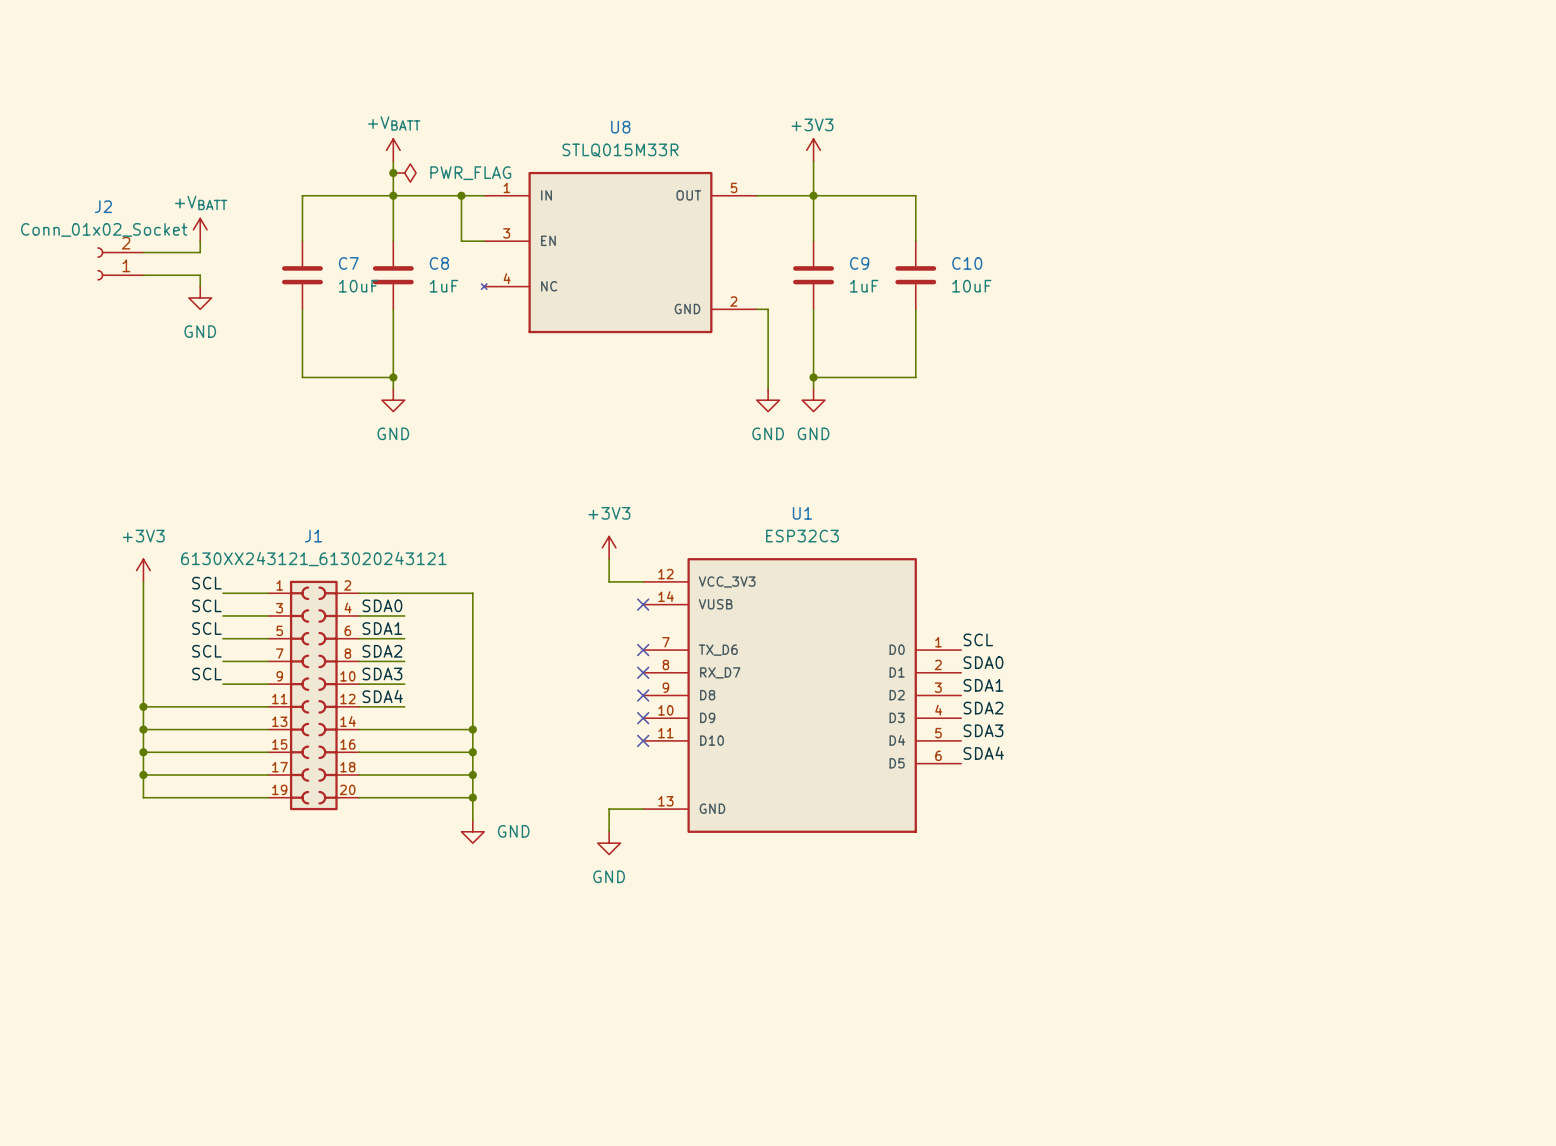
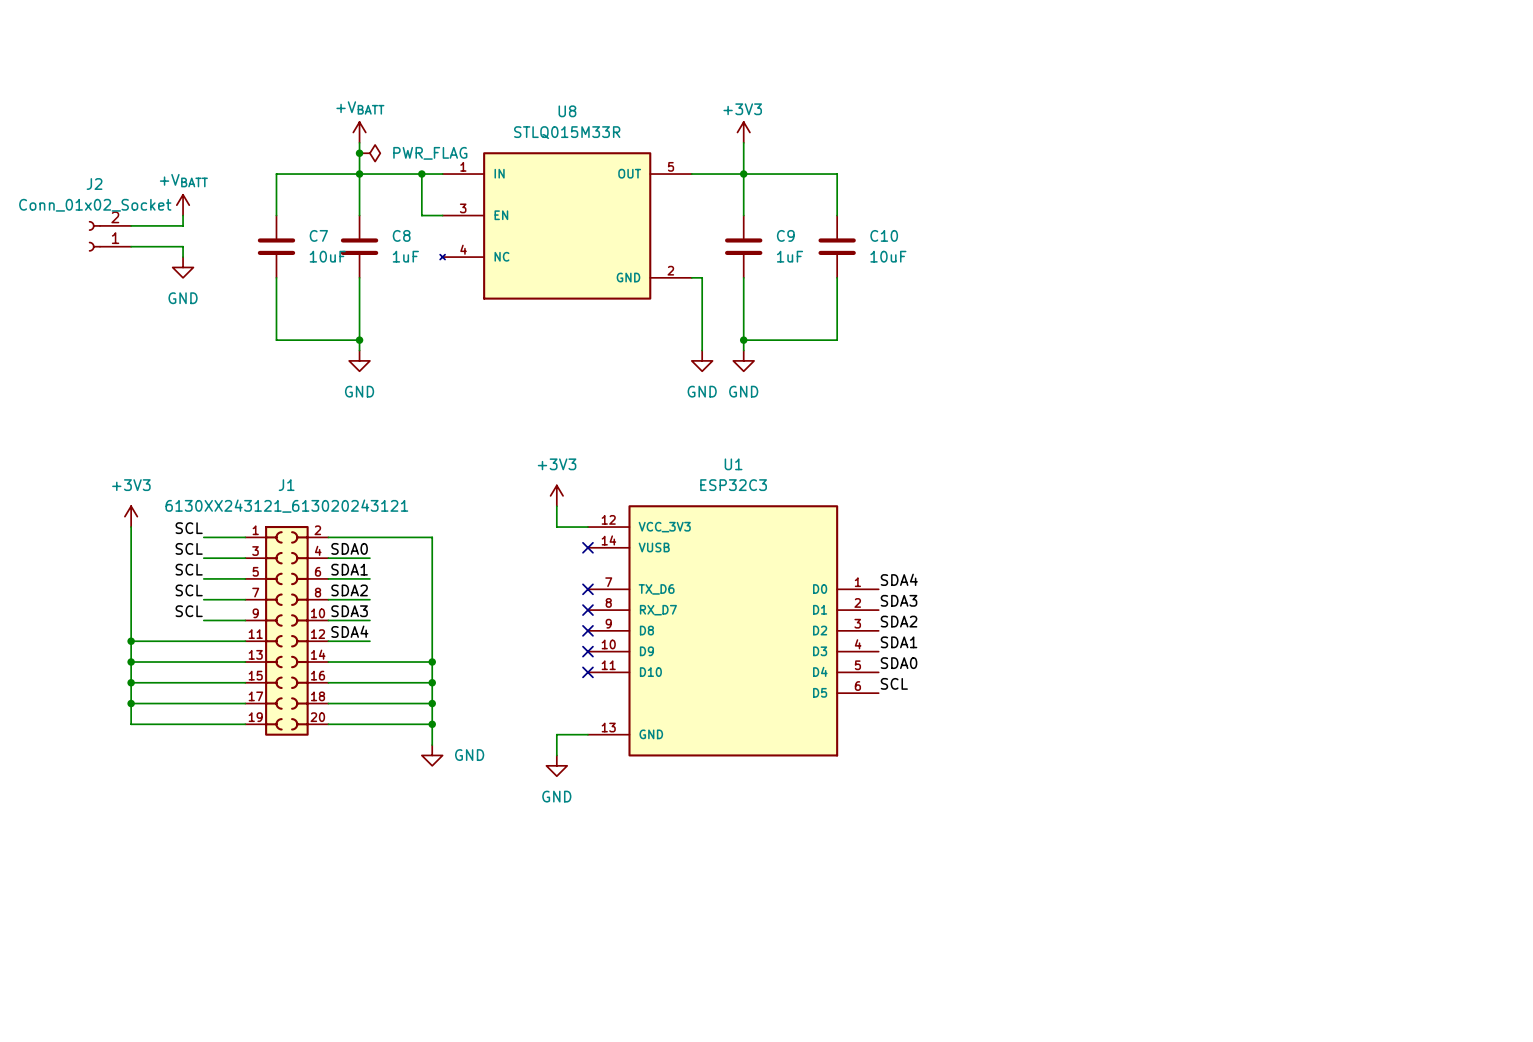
label: SCL (978, 639) -> SDA4 (899, 579)
label: SDA0 (983, 662) -> SDA3 (899, 600)
label: SDA1 (983, 685) -> SDA2 (899, 621)
label: SDA2 (983, 708) -> SDA1 (899, 642)
label: SDA3 (983, 730) -> SDA0 (899, 663)
label: SDA4 (983, 753) -> SCL (894, 683)

